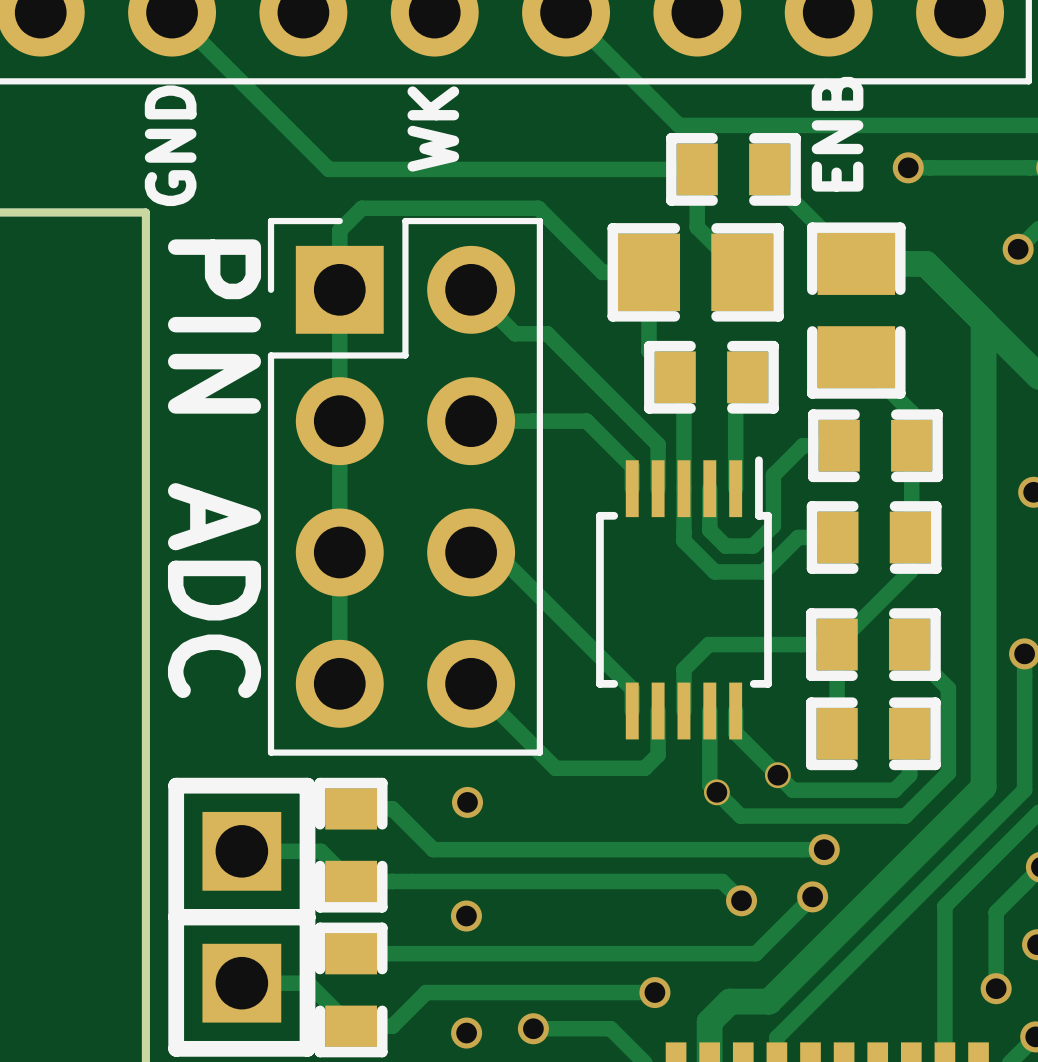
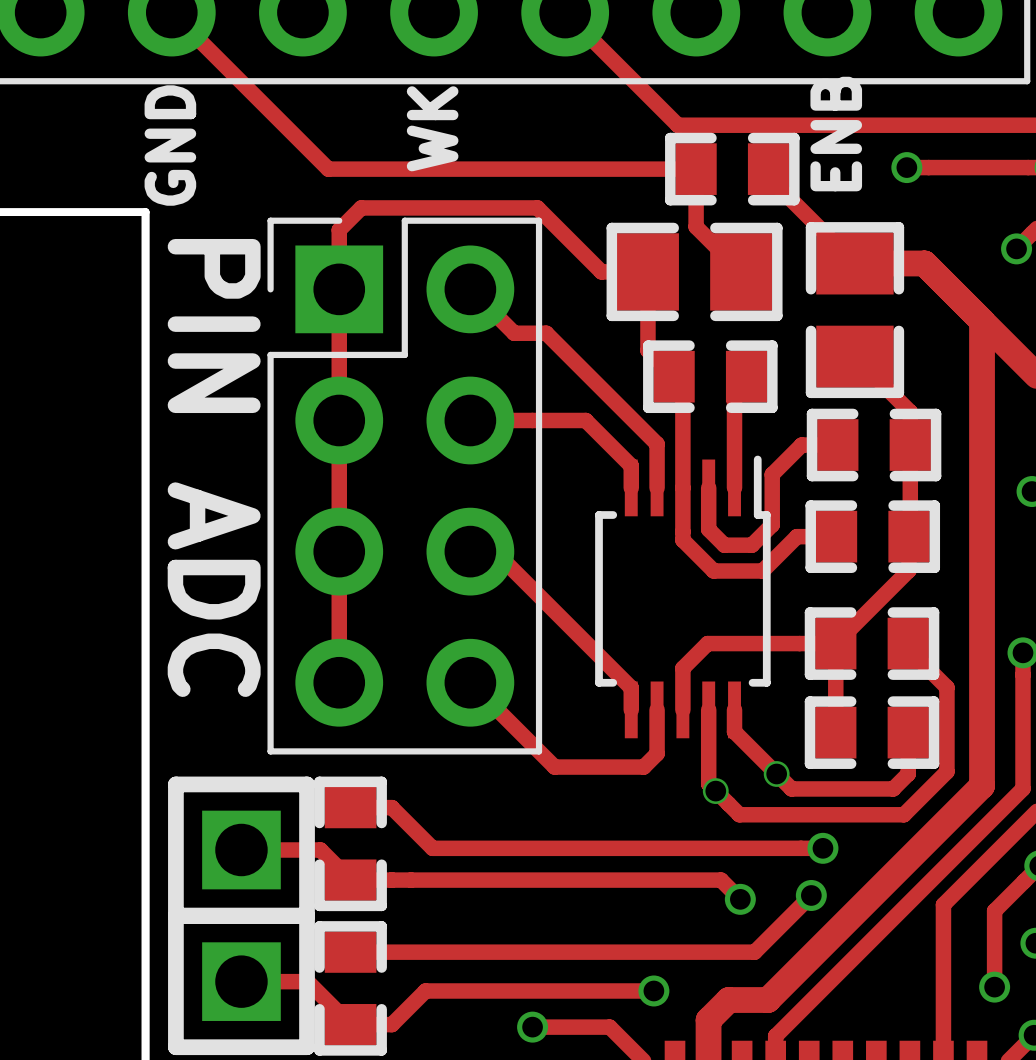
via: (467, 802) -> none
via: (466, 916) -> none
via: (466, 1033) -> none

